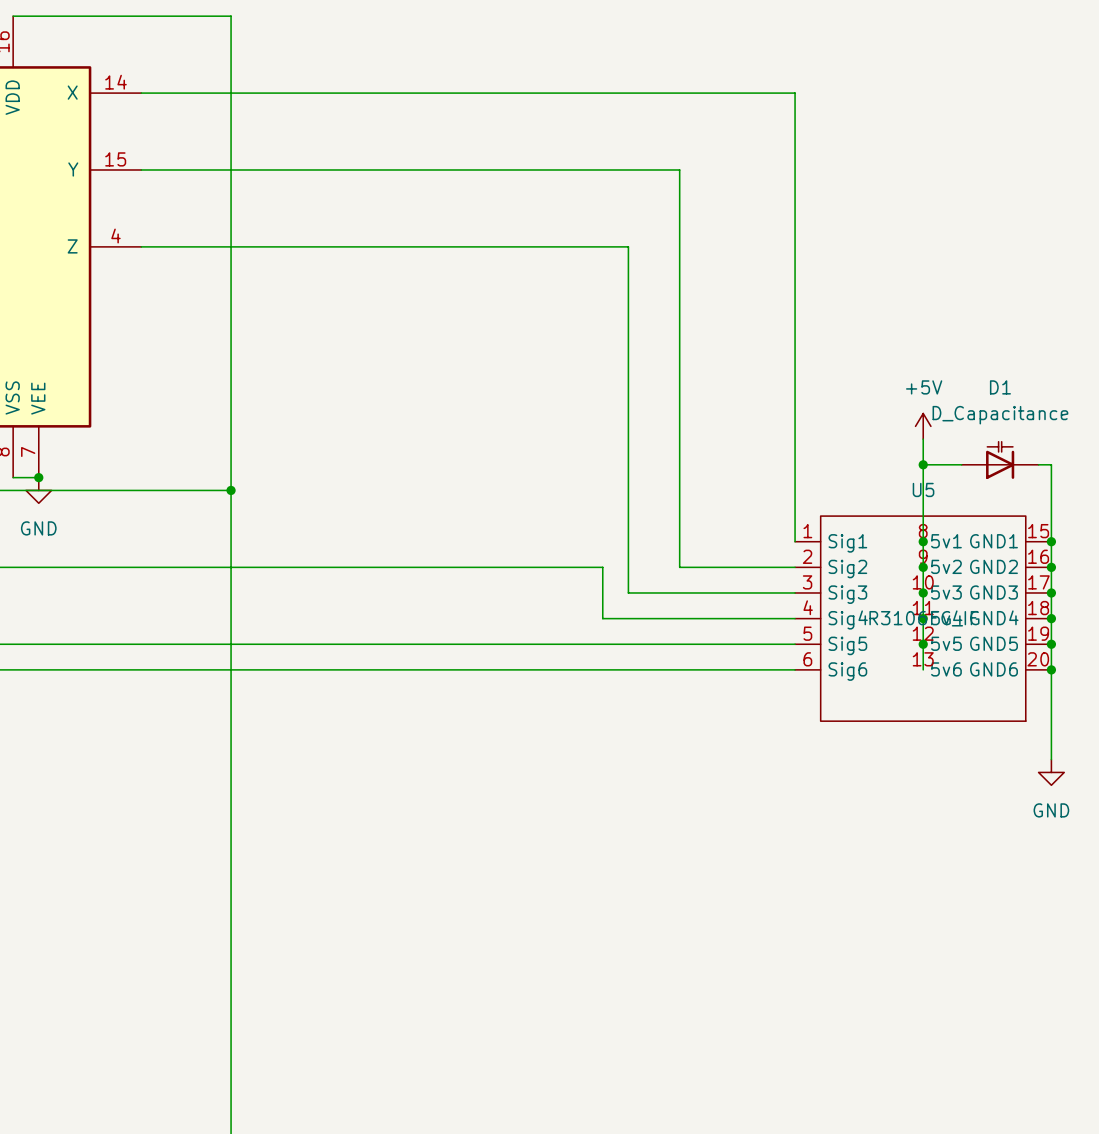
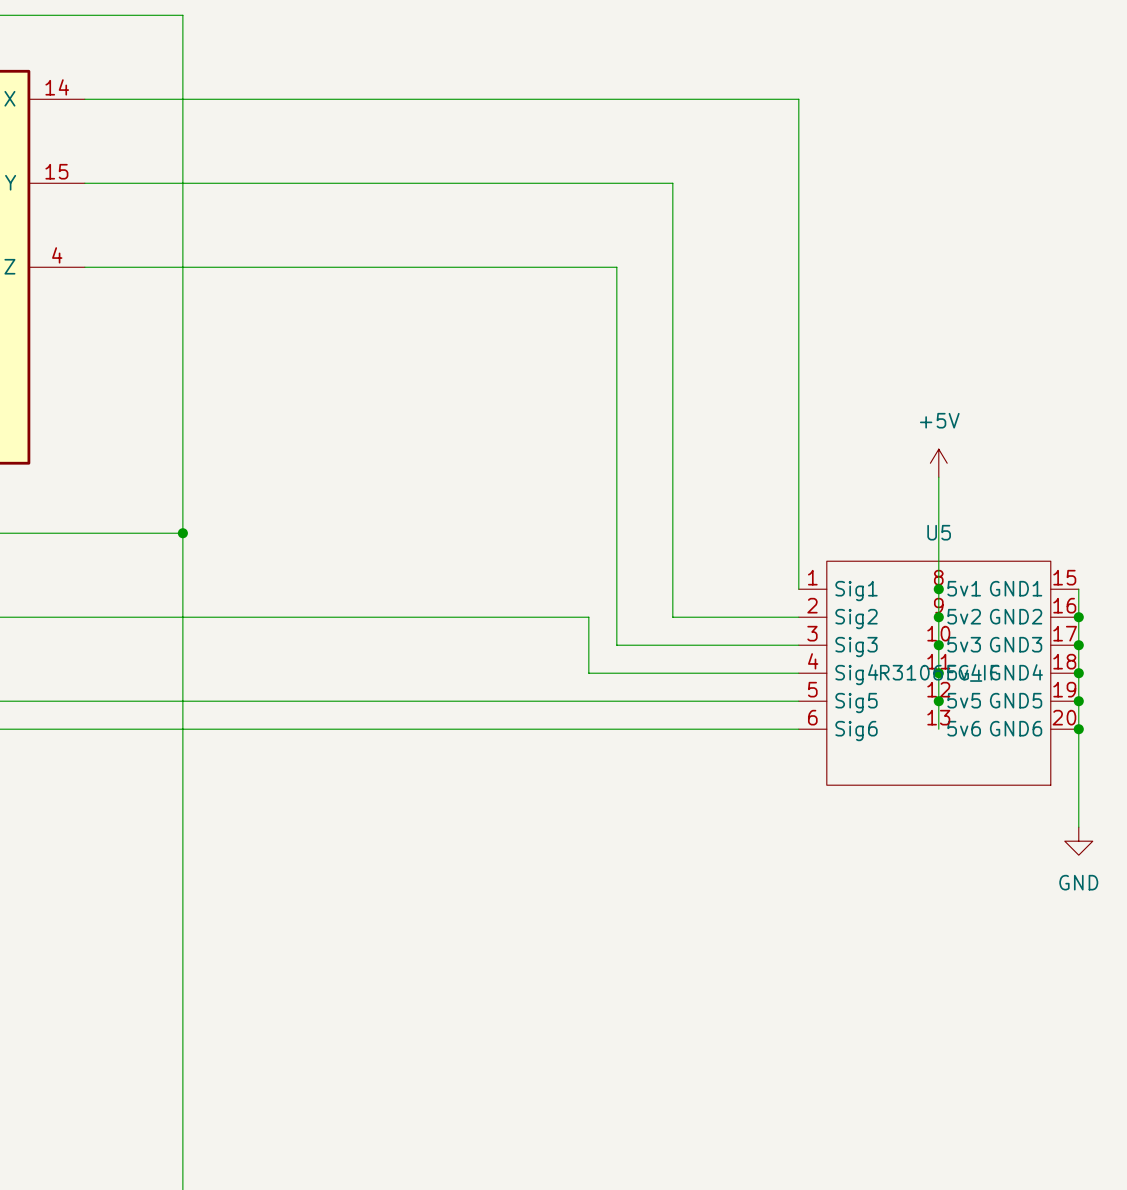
D1: D_Capacitance (1000, 460) -> none
wire: (923, 464) (961, 464) -> none
junction: (923, 464) -> none
wire: (1038, 464) (1051, 464) (1051, 541) -> none
junction: (1051, 541) -> none

